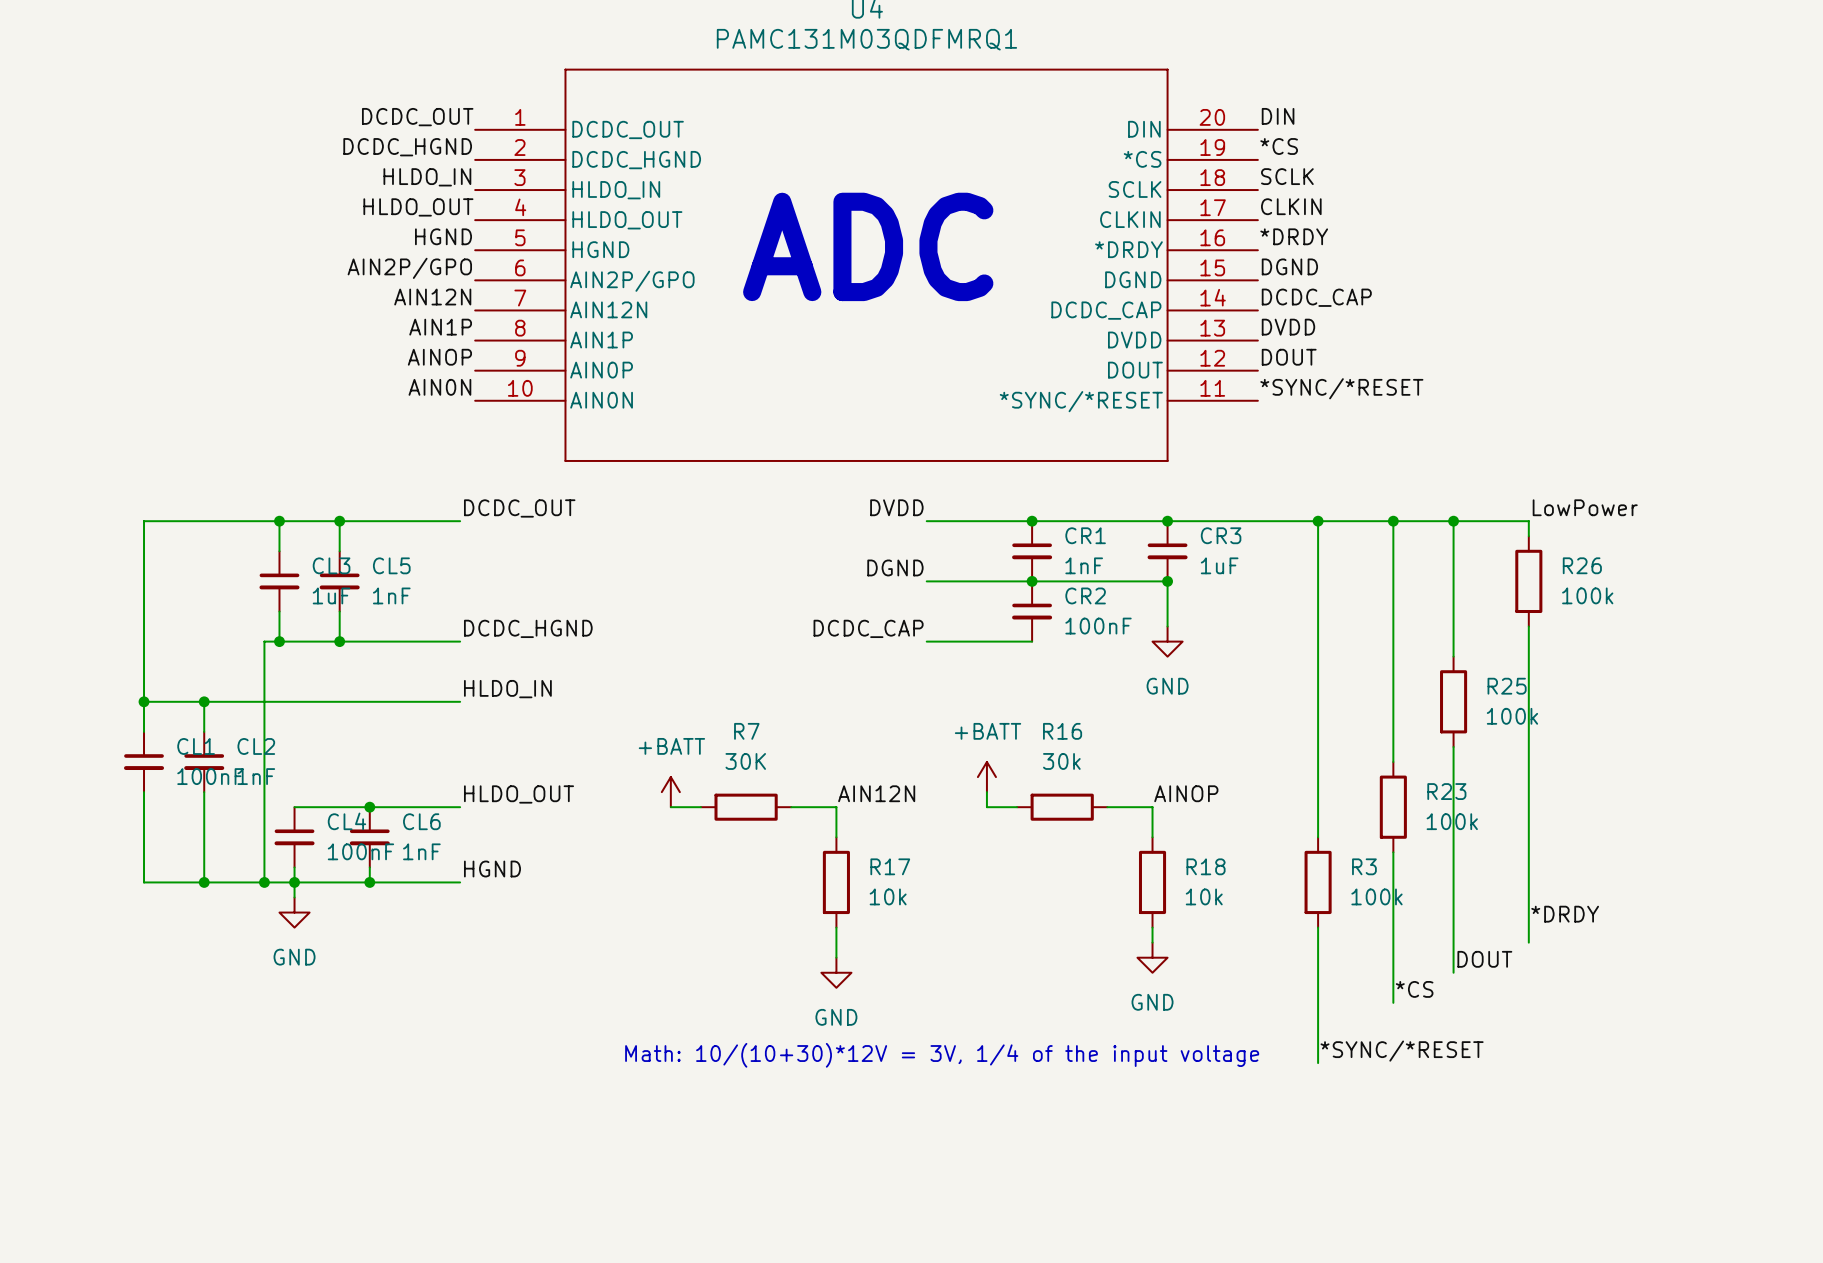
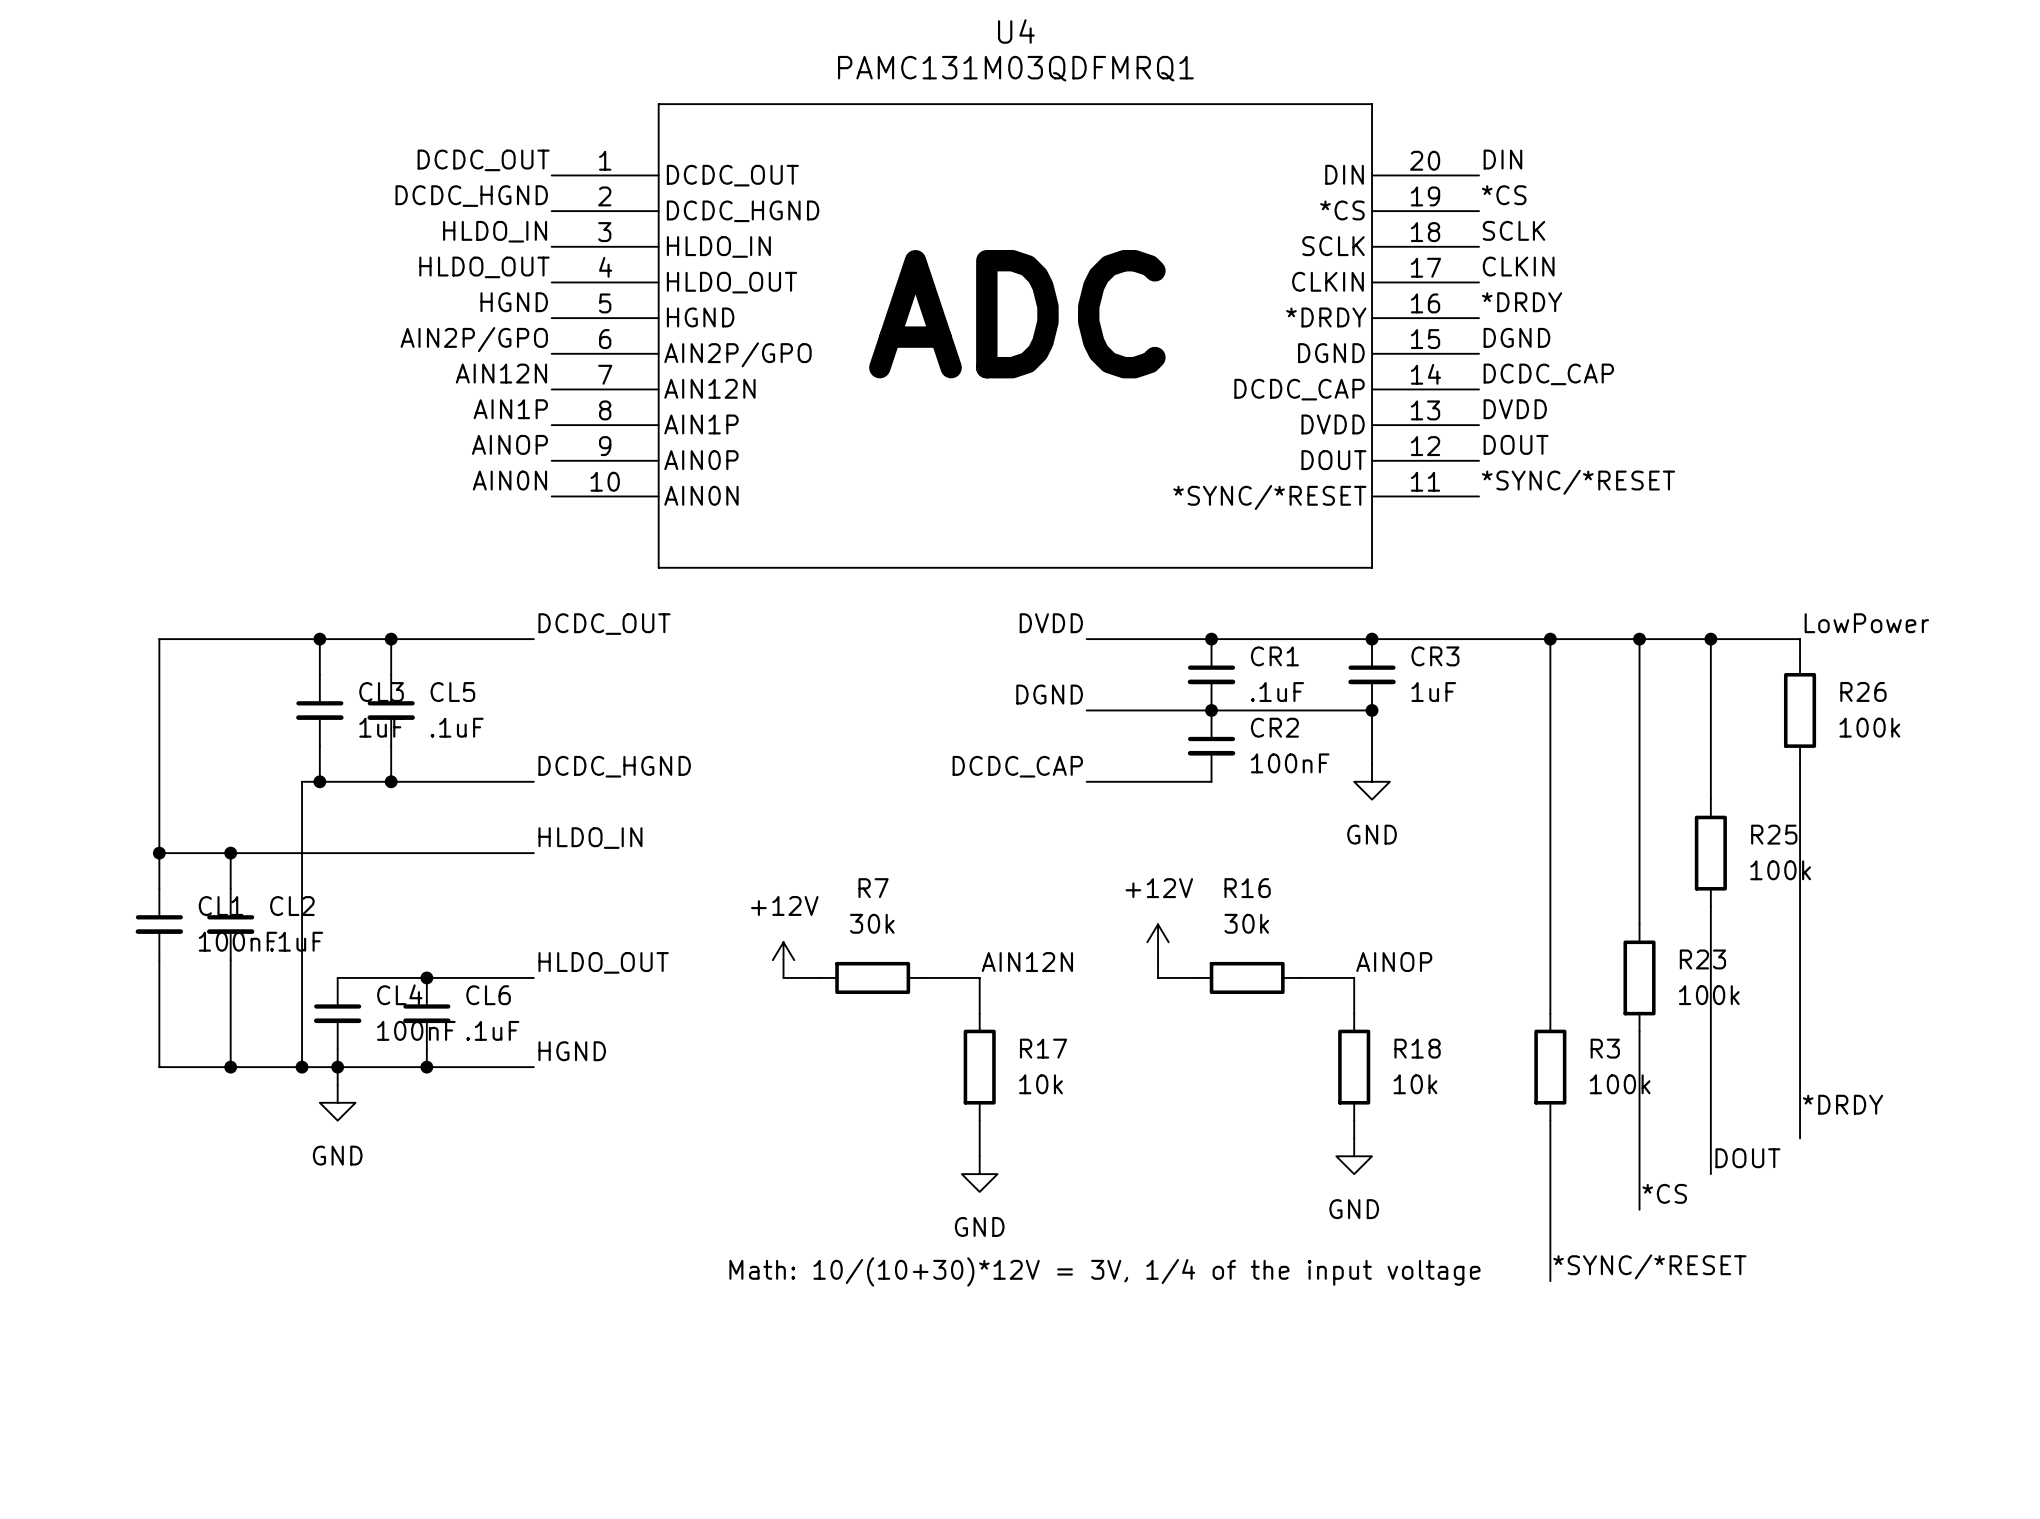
CR1 value: 1nF (1084, 565) -> .1uF (1277, 692)
CL5 value: 1nF (391, 595) -> .1uF (457, 727)
R7 value: 30K (745, 761) -> 30k (872, 923)
CL2 value: 1nF (256, 776) -> .1uF (296, 941)
power symbol: +BATT (986, 777) -> +12V (1158, 942)
power symbol: +BATT (670, 792) -> +12V (783, 960)
CL6 value: 1nF (421, 851) -> .1uF (492, 1030)

